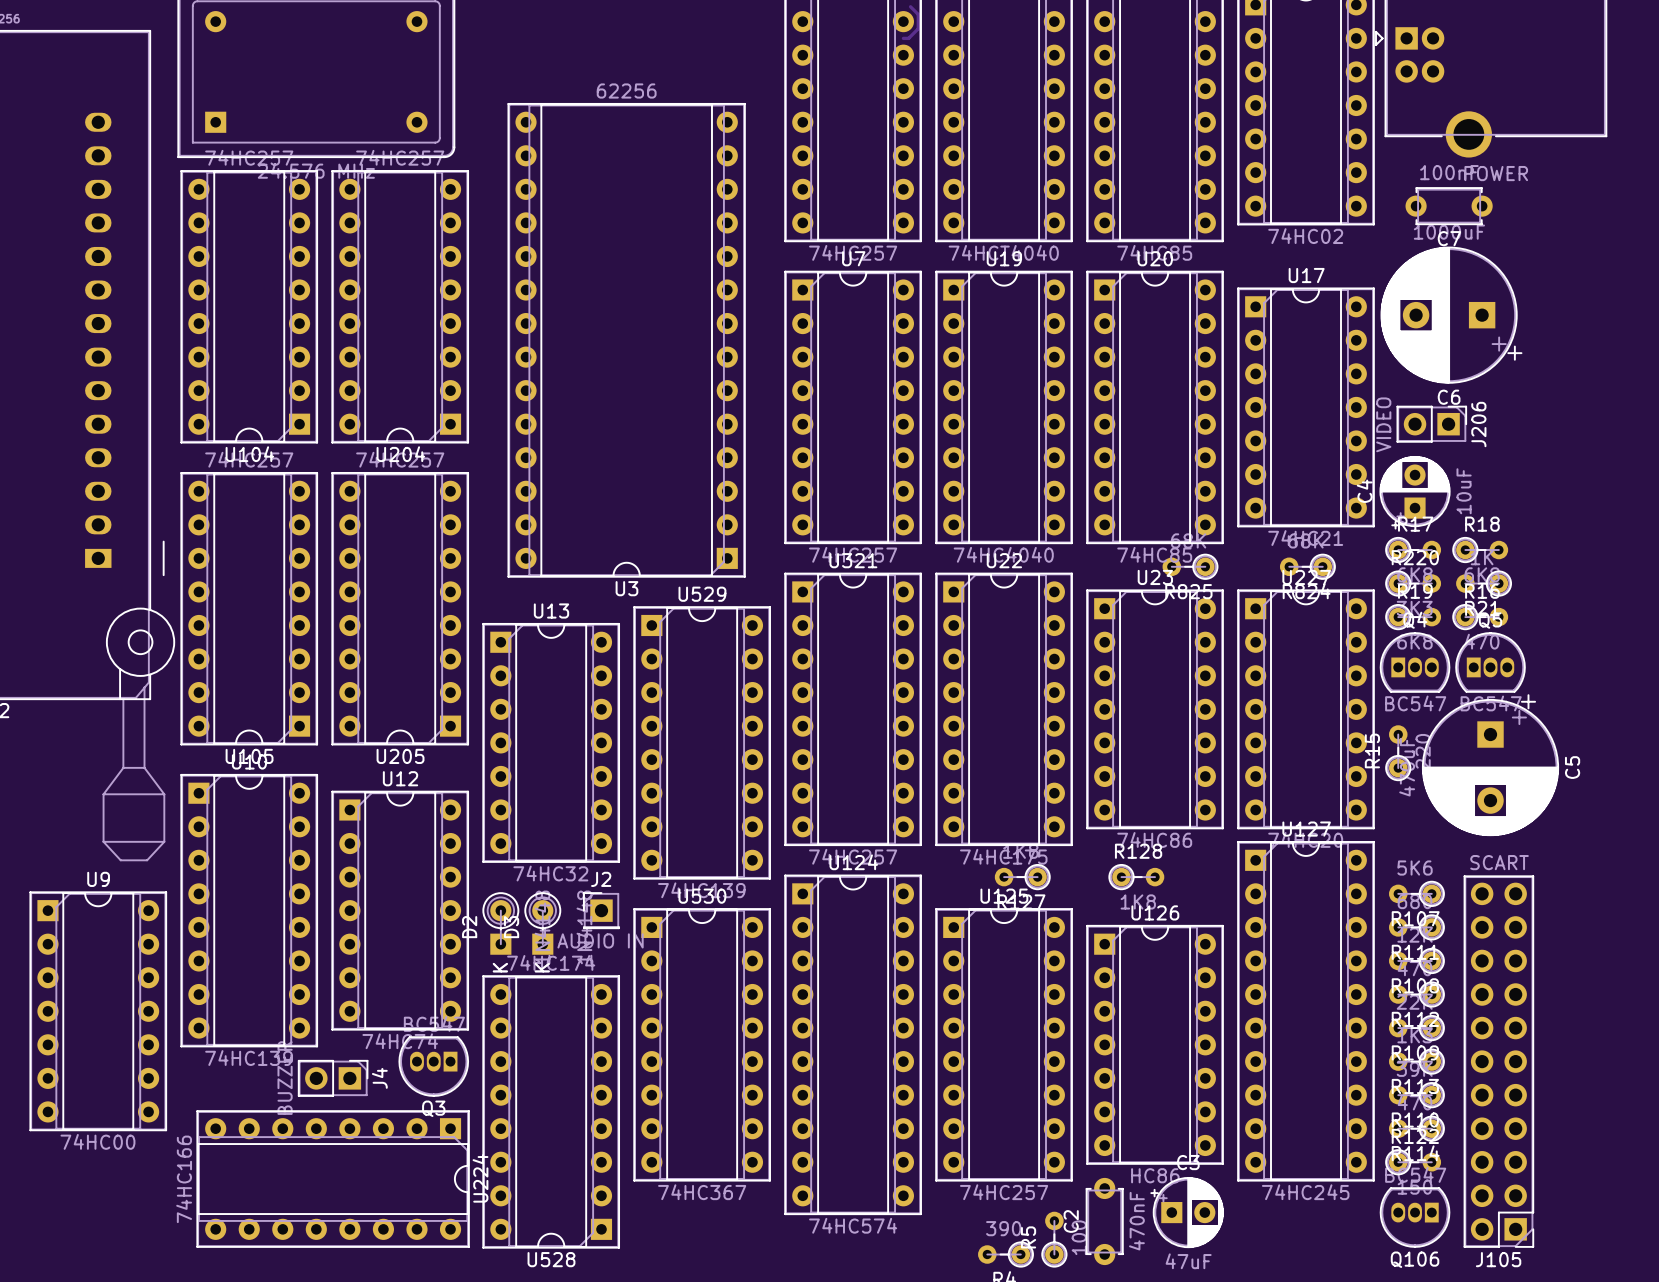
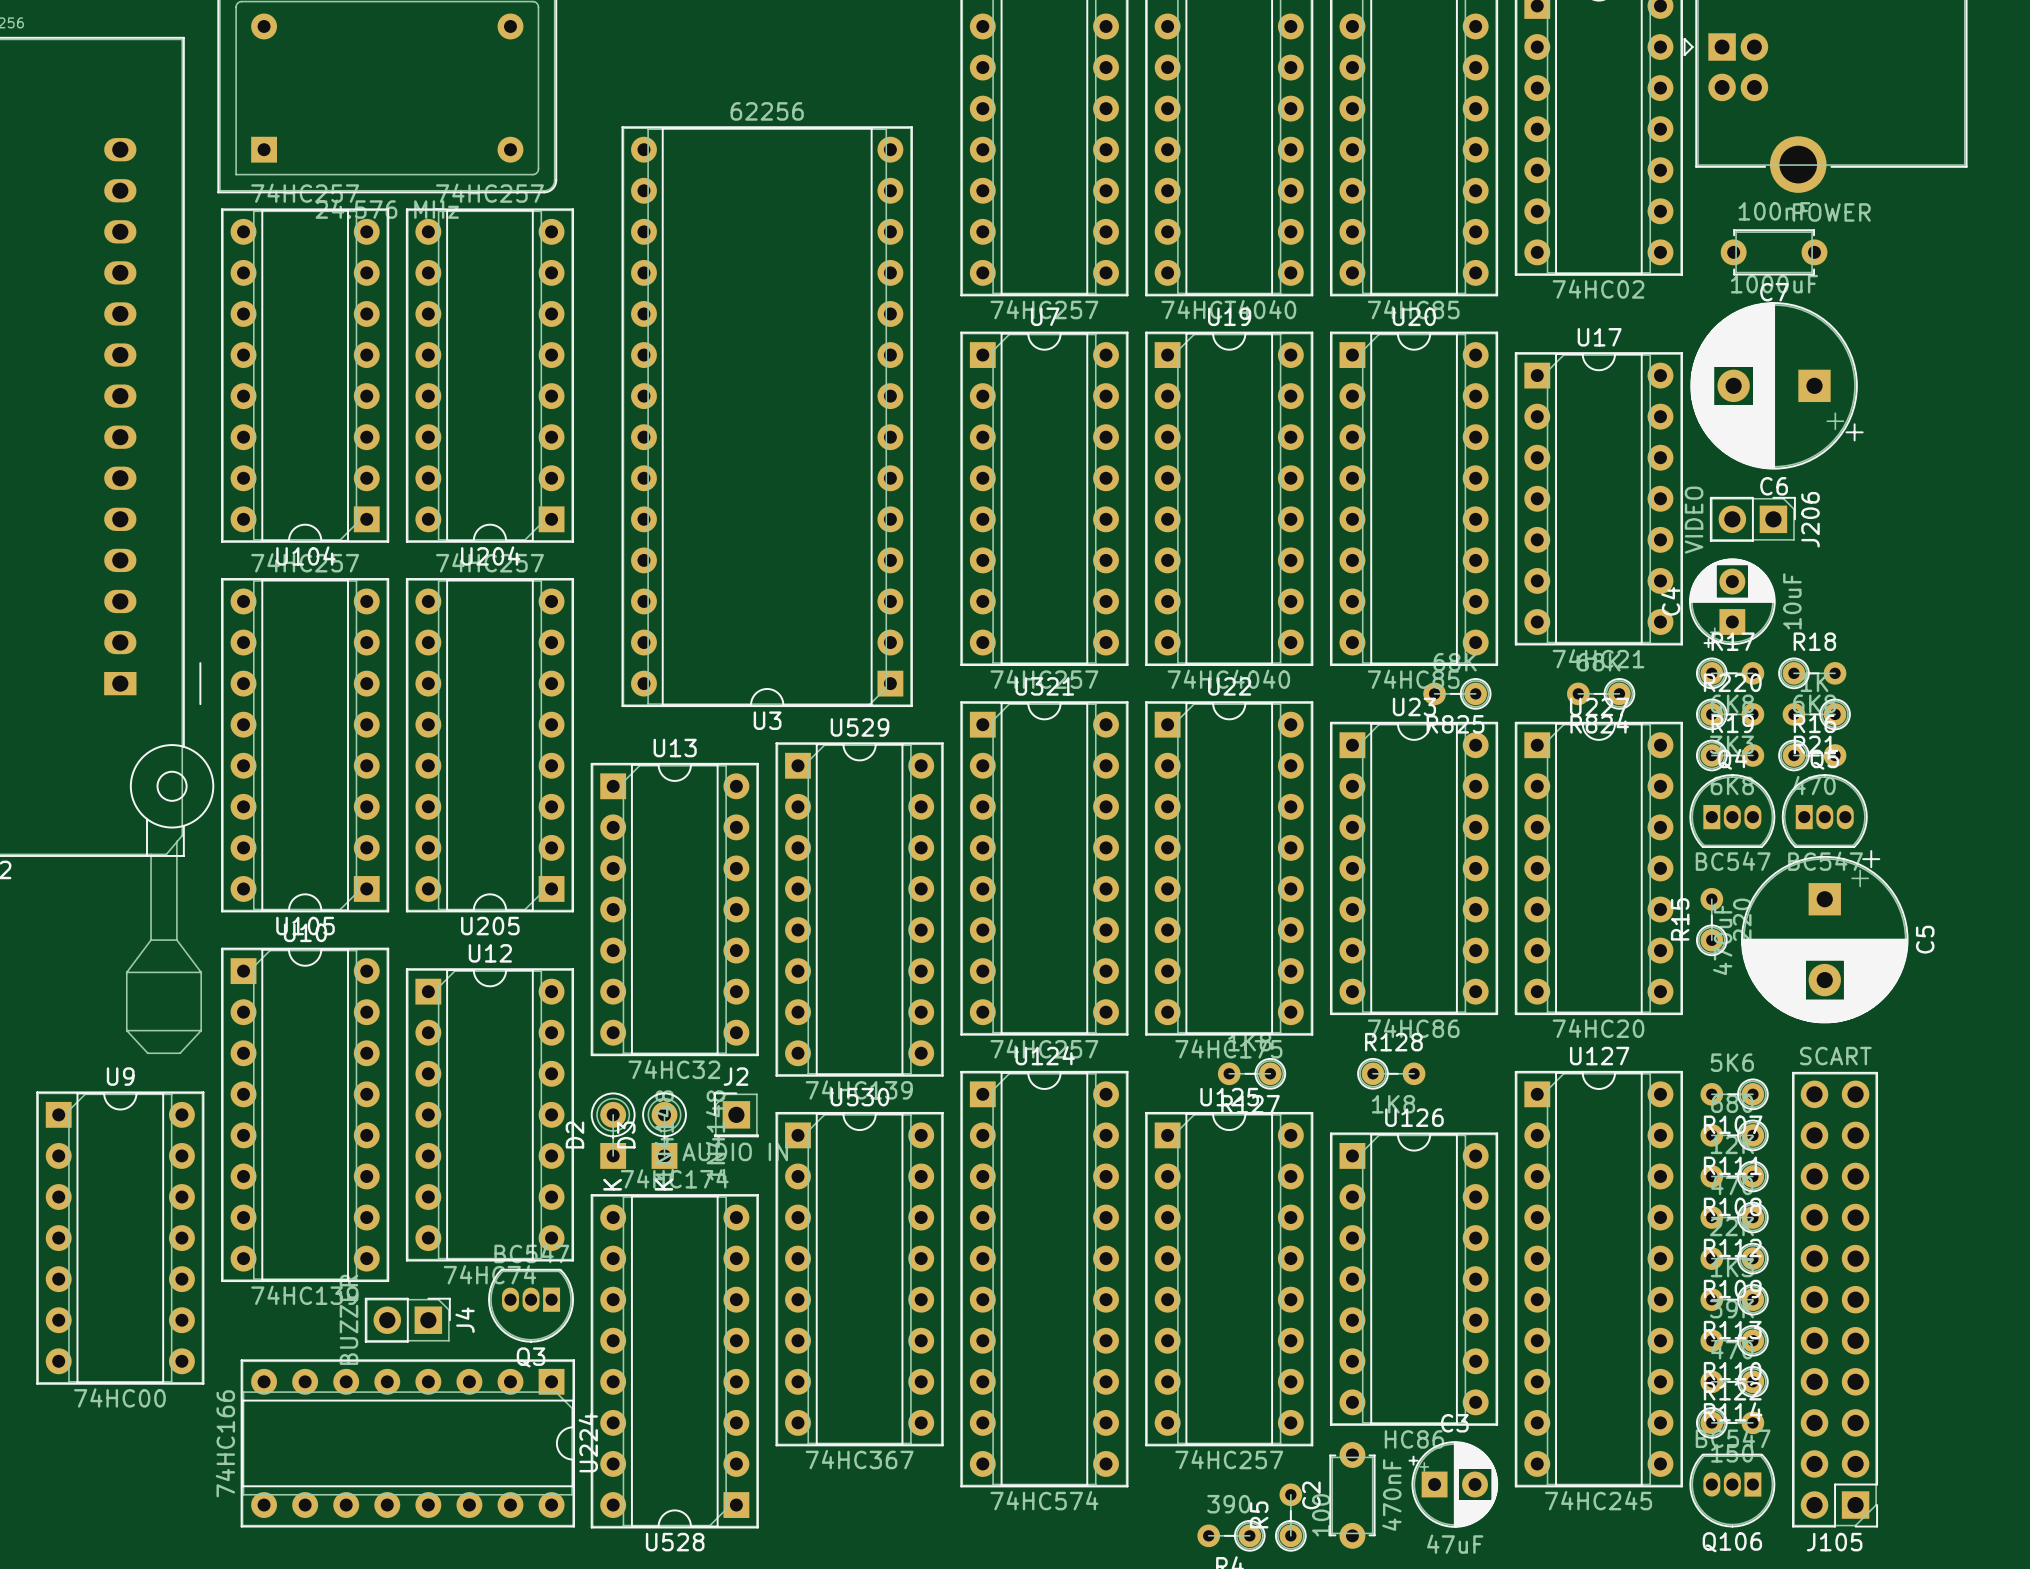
track: (910, 6) (918, 14) (918, 28) (908, 38) (903, 38) -> none
U127 position: (1306, 1011) -> (1598, 1279)

